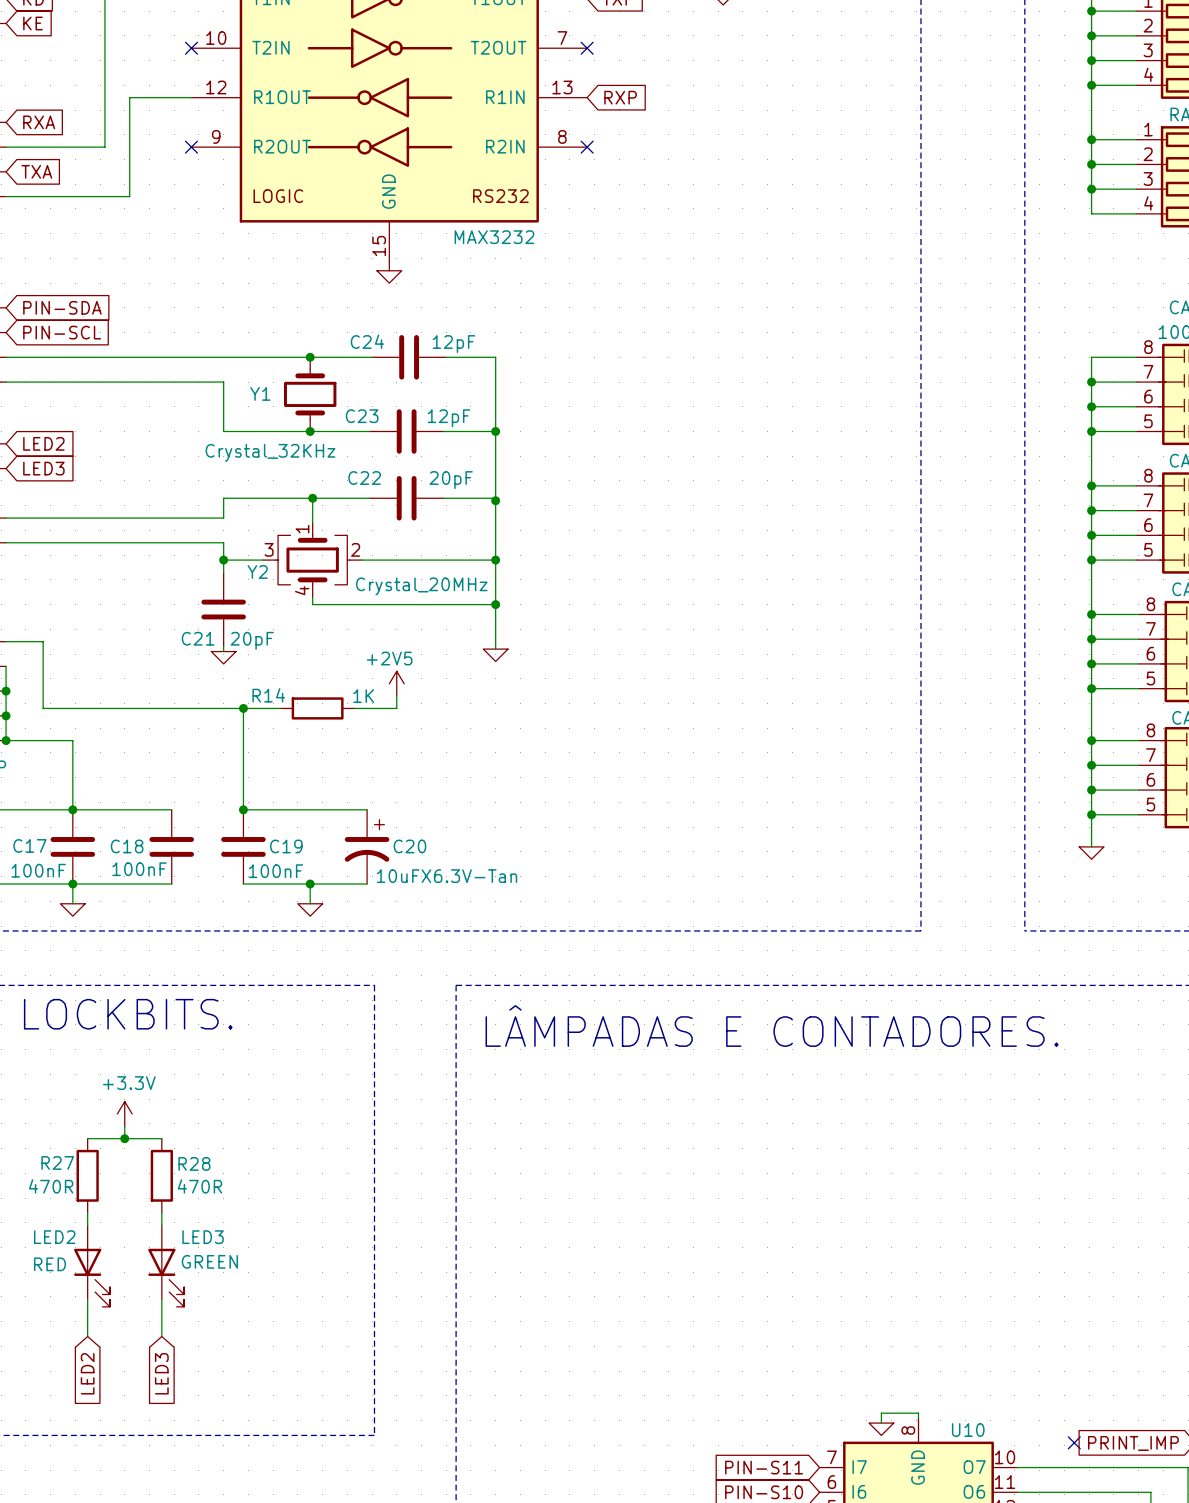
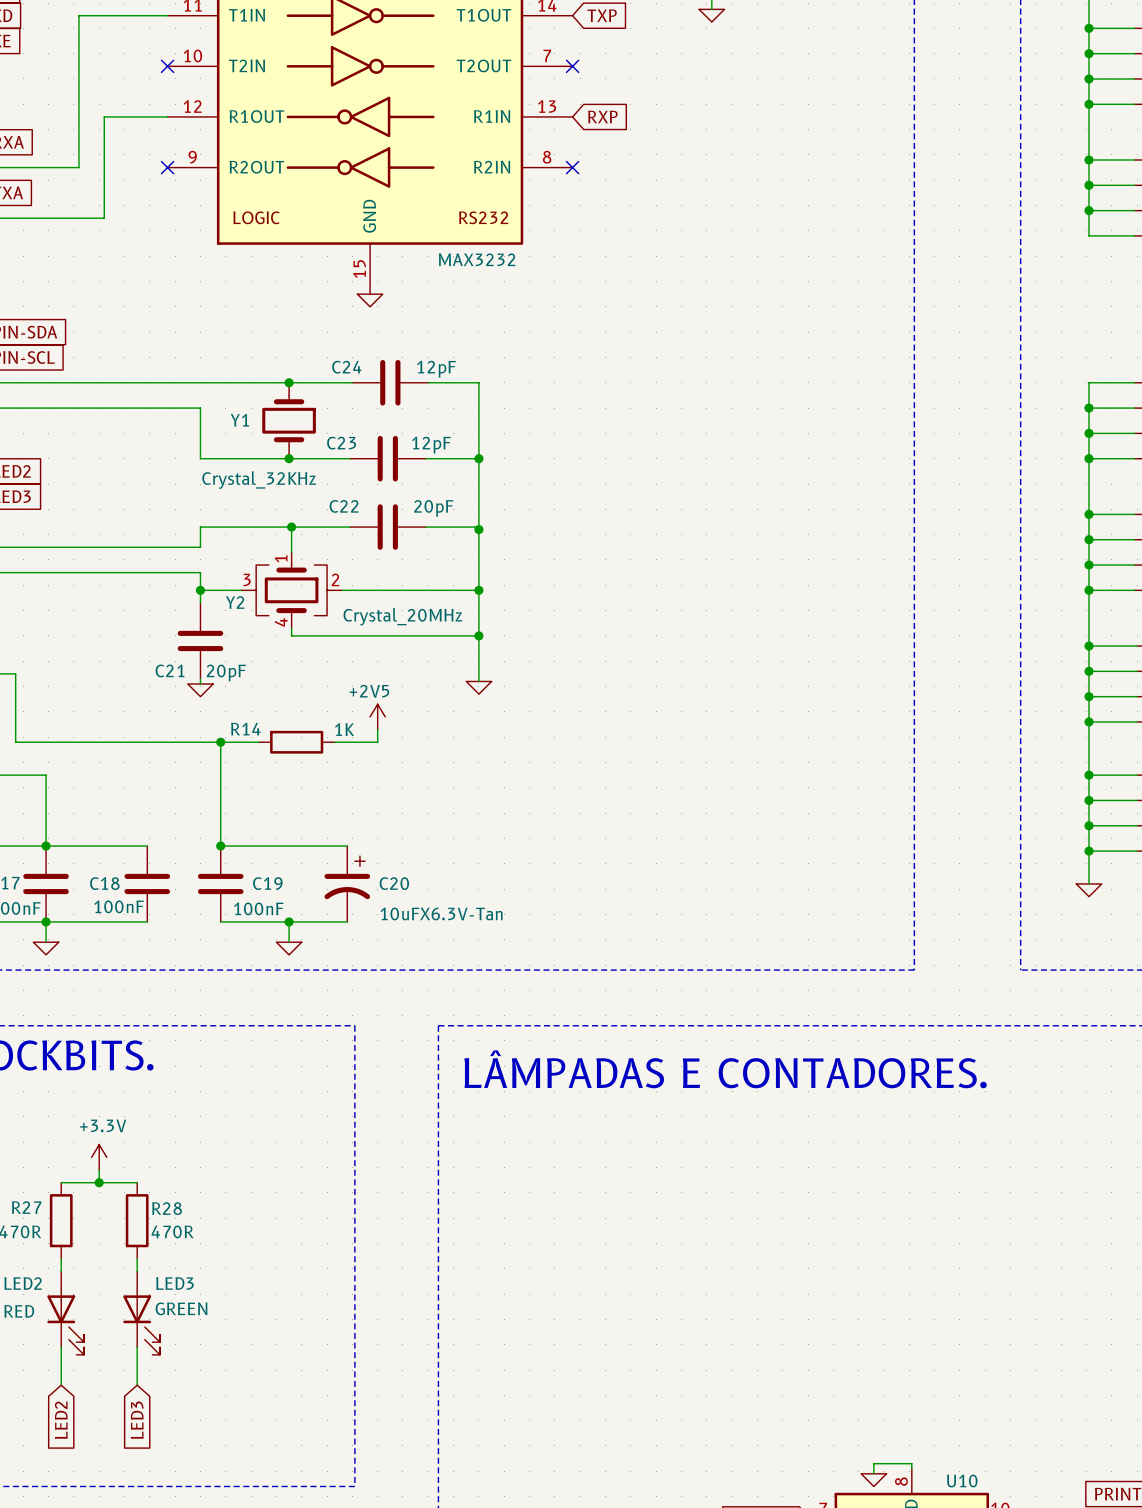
no-connect mark: (1074, 1442) -> none

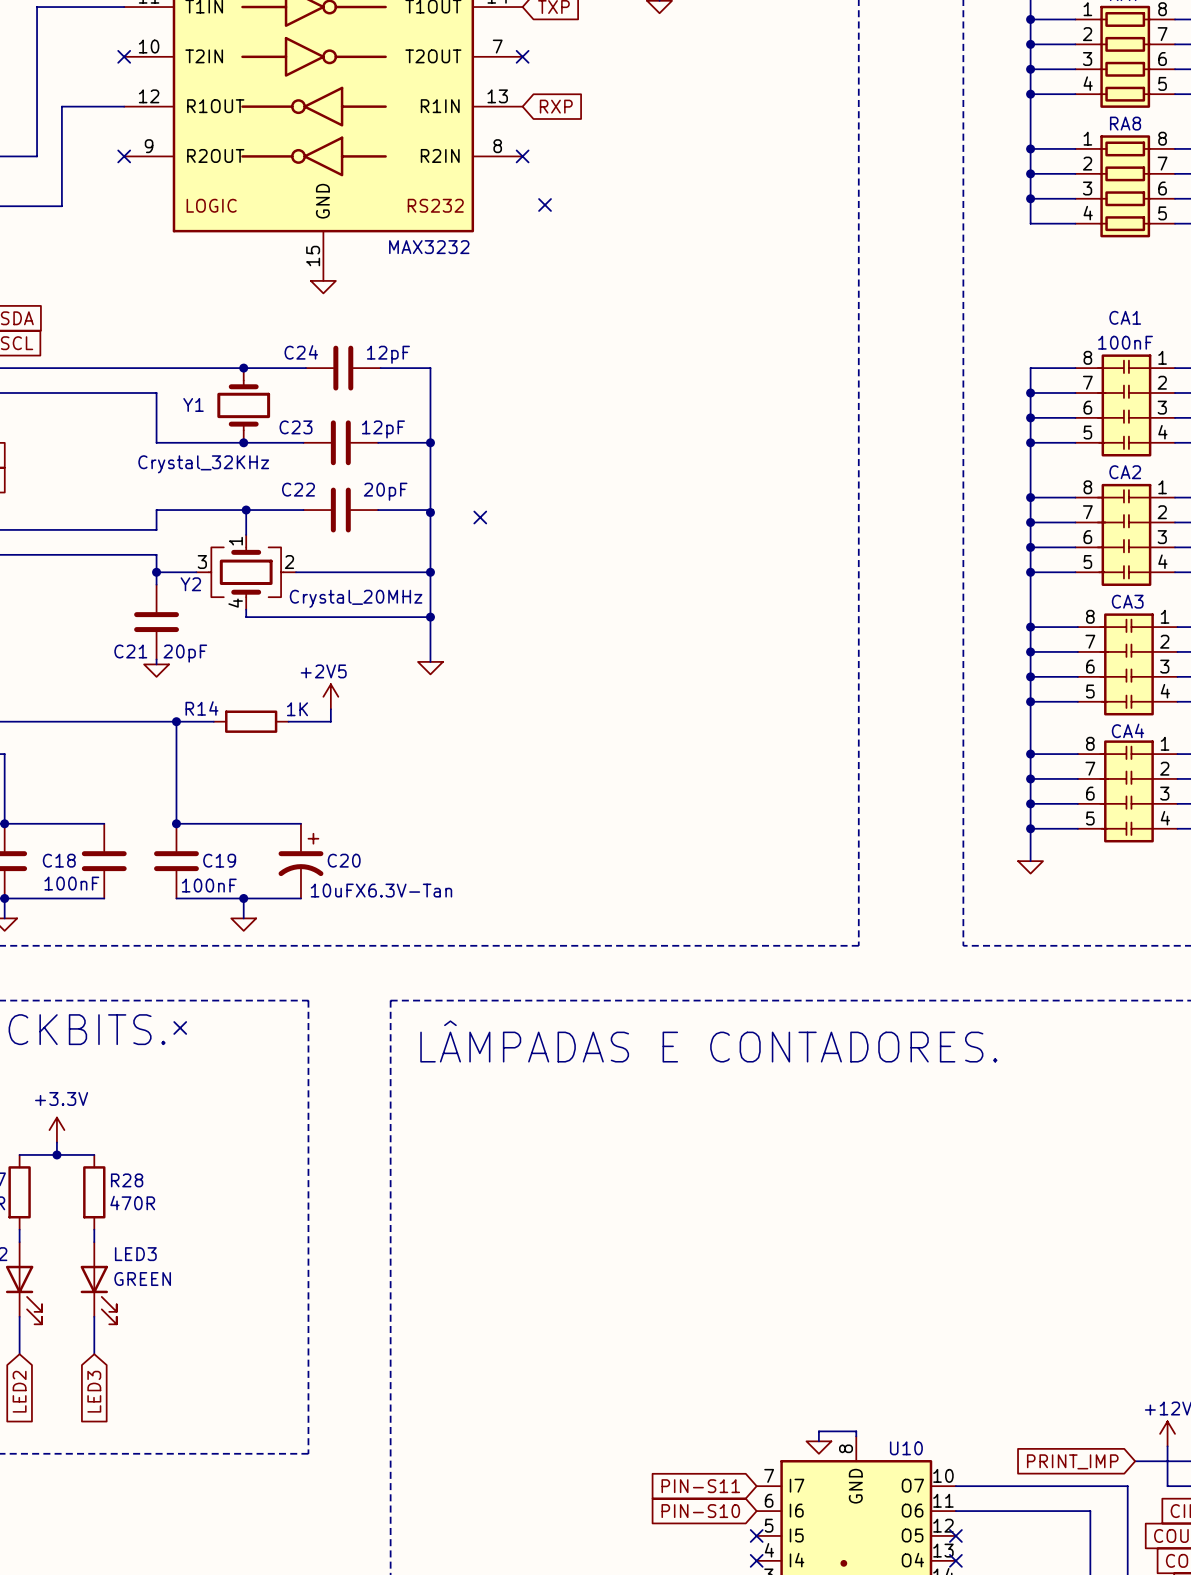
no-connect mark: none -> (545, 204)
no-connect mark: none -> (480, 517)
no-connect mark: none -> (180, 1027)

